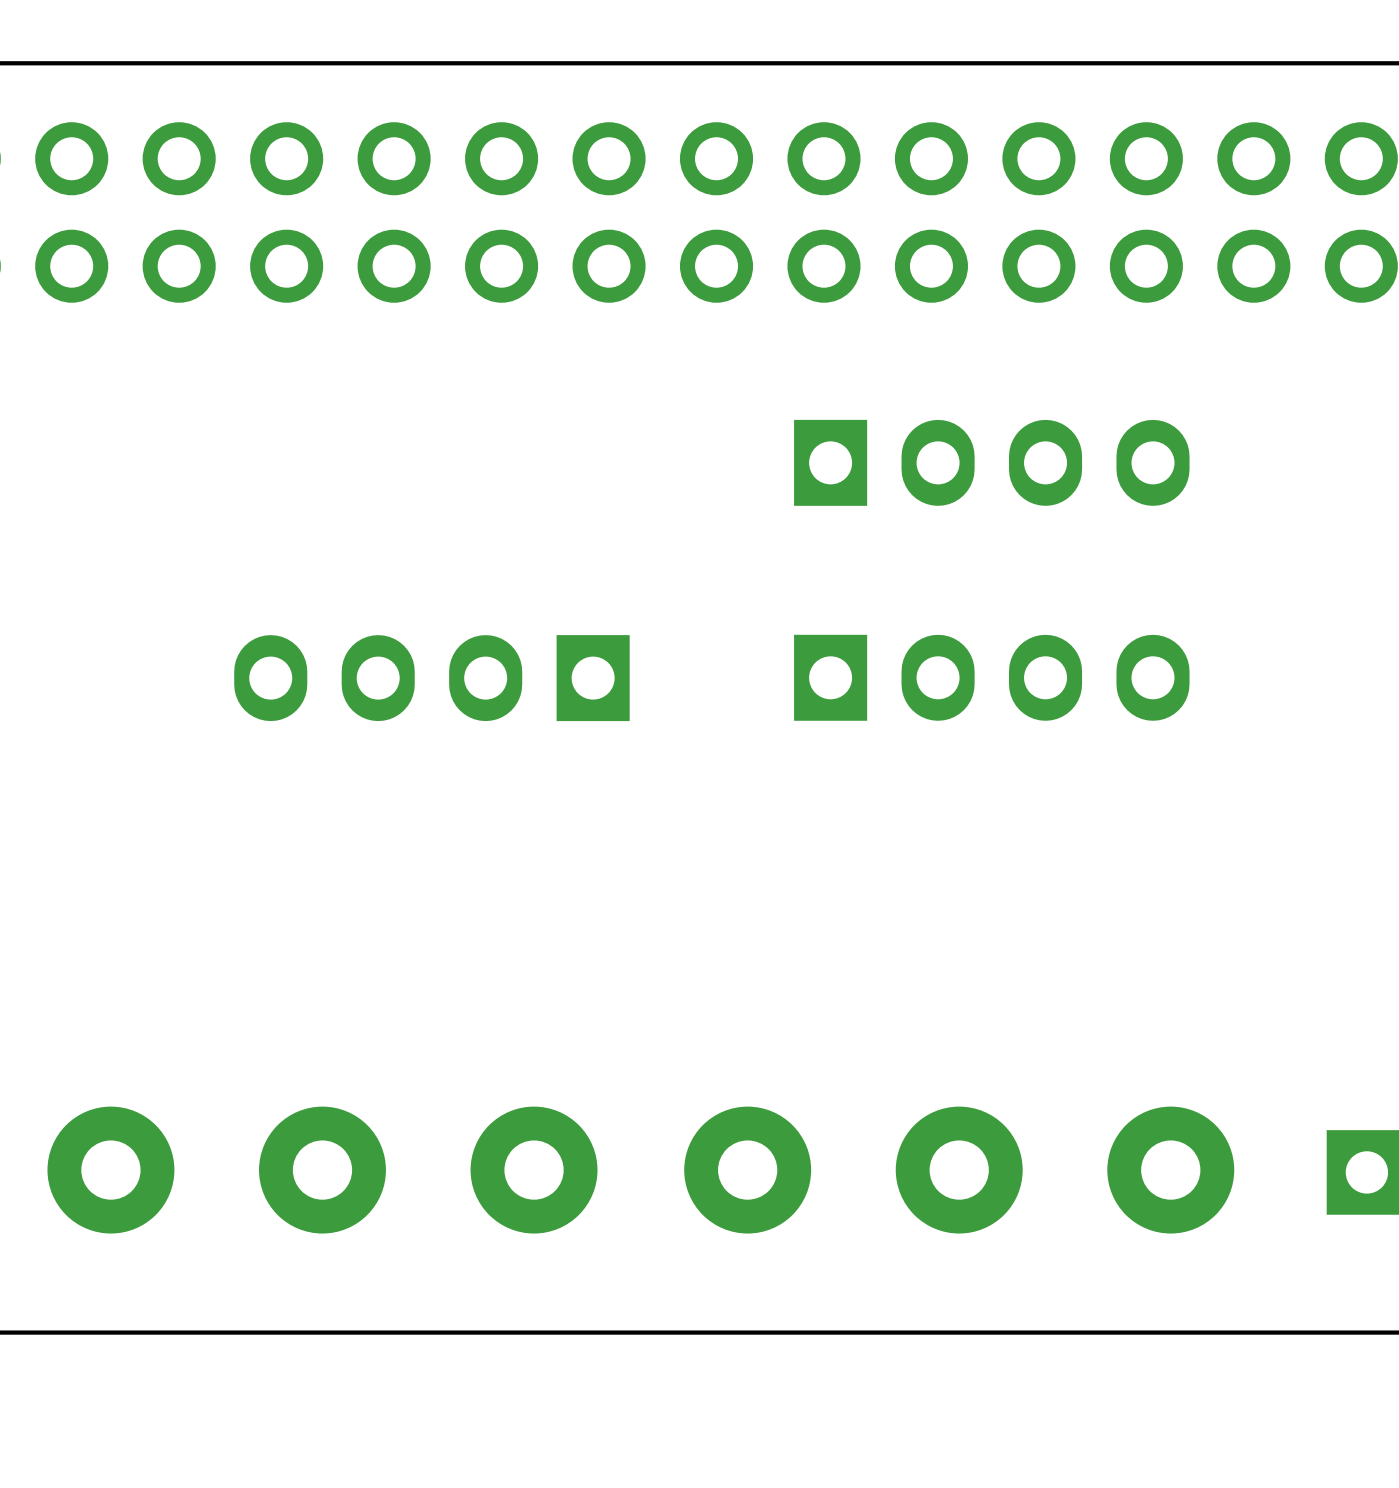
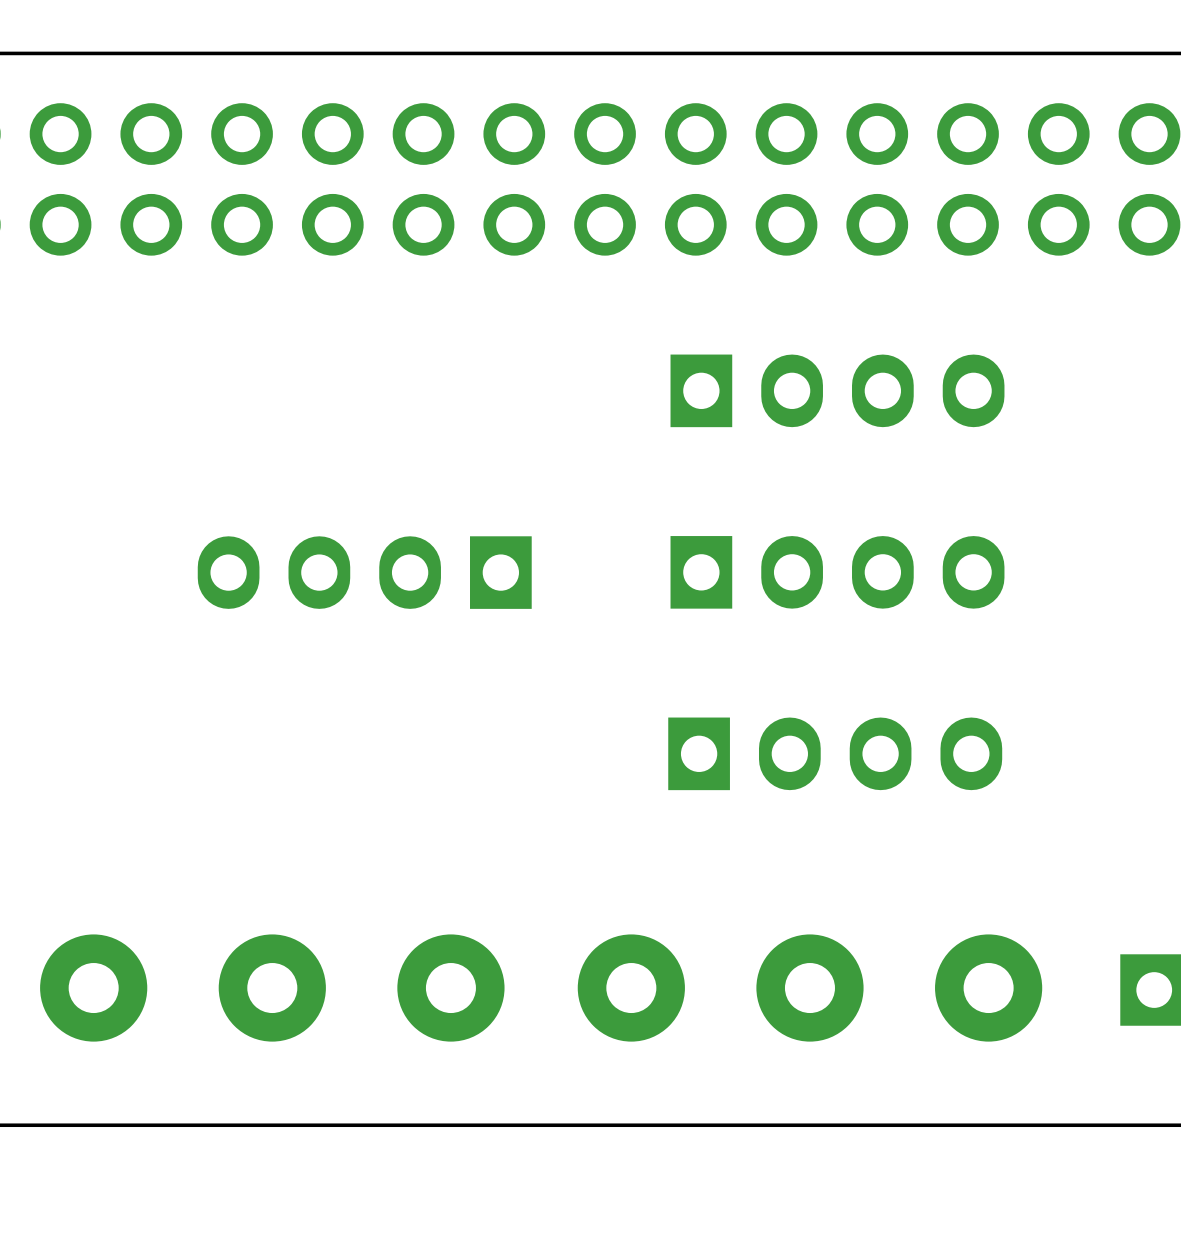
part: none -> (835, 753)

